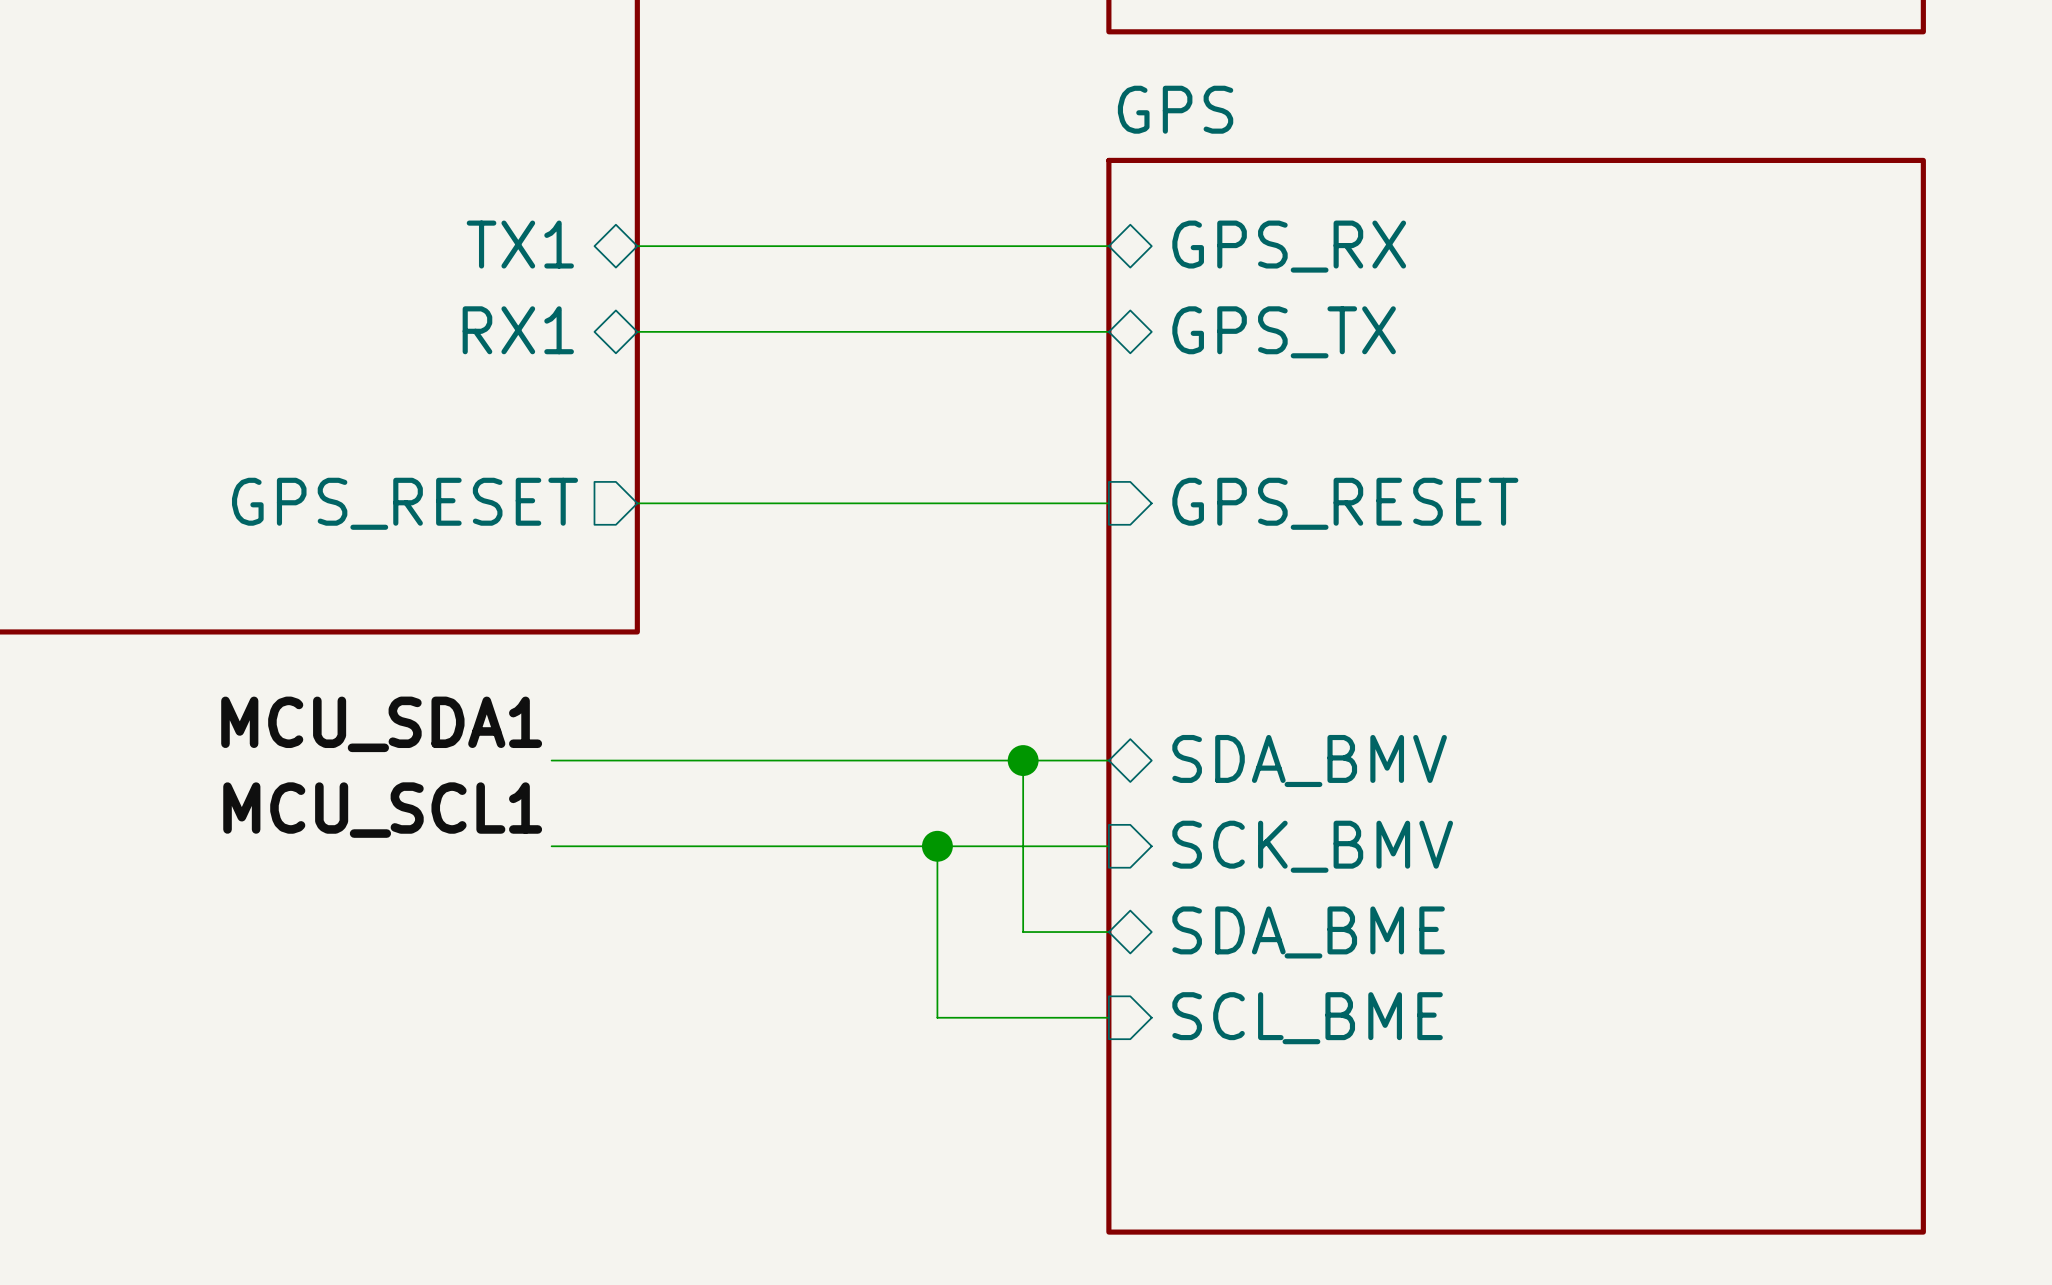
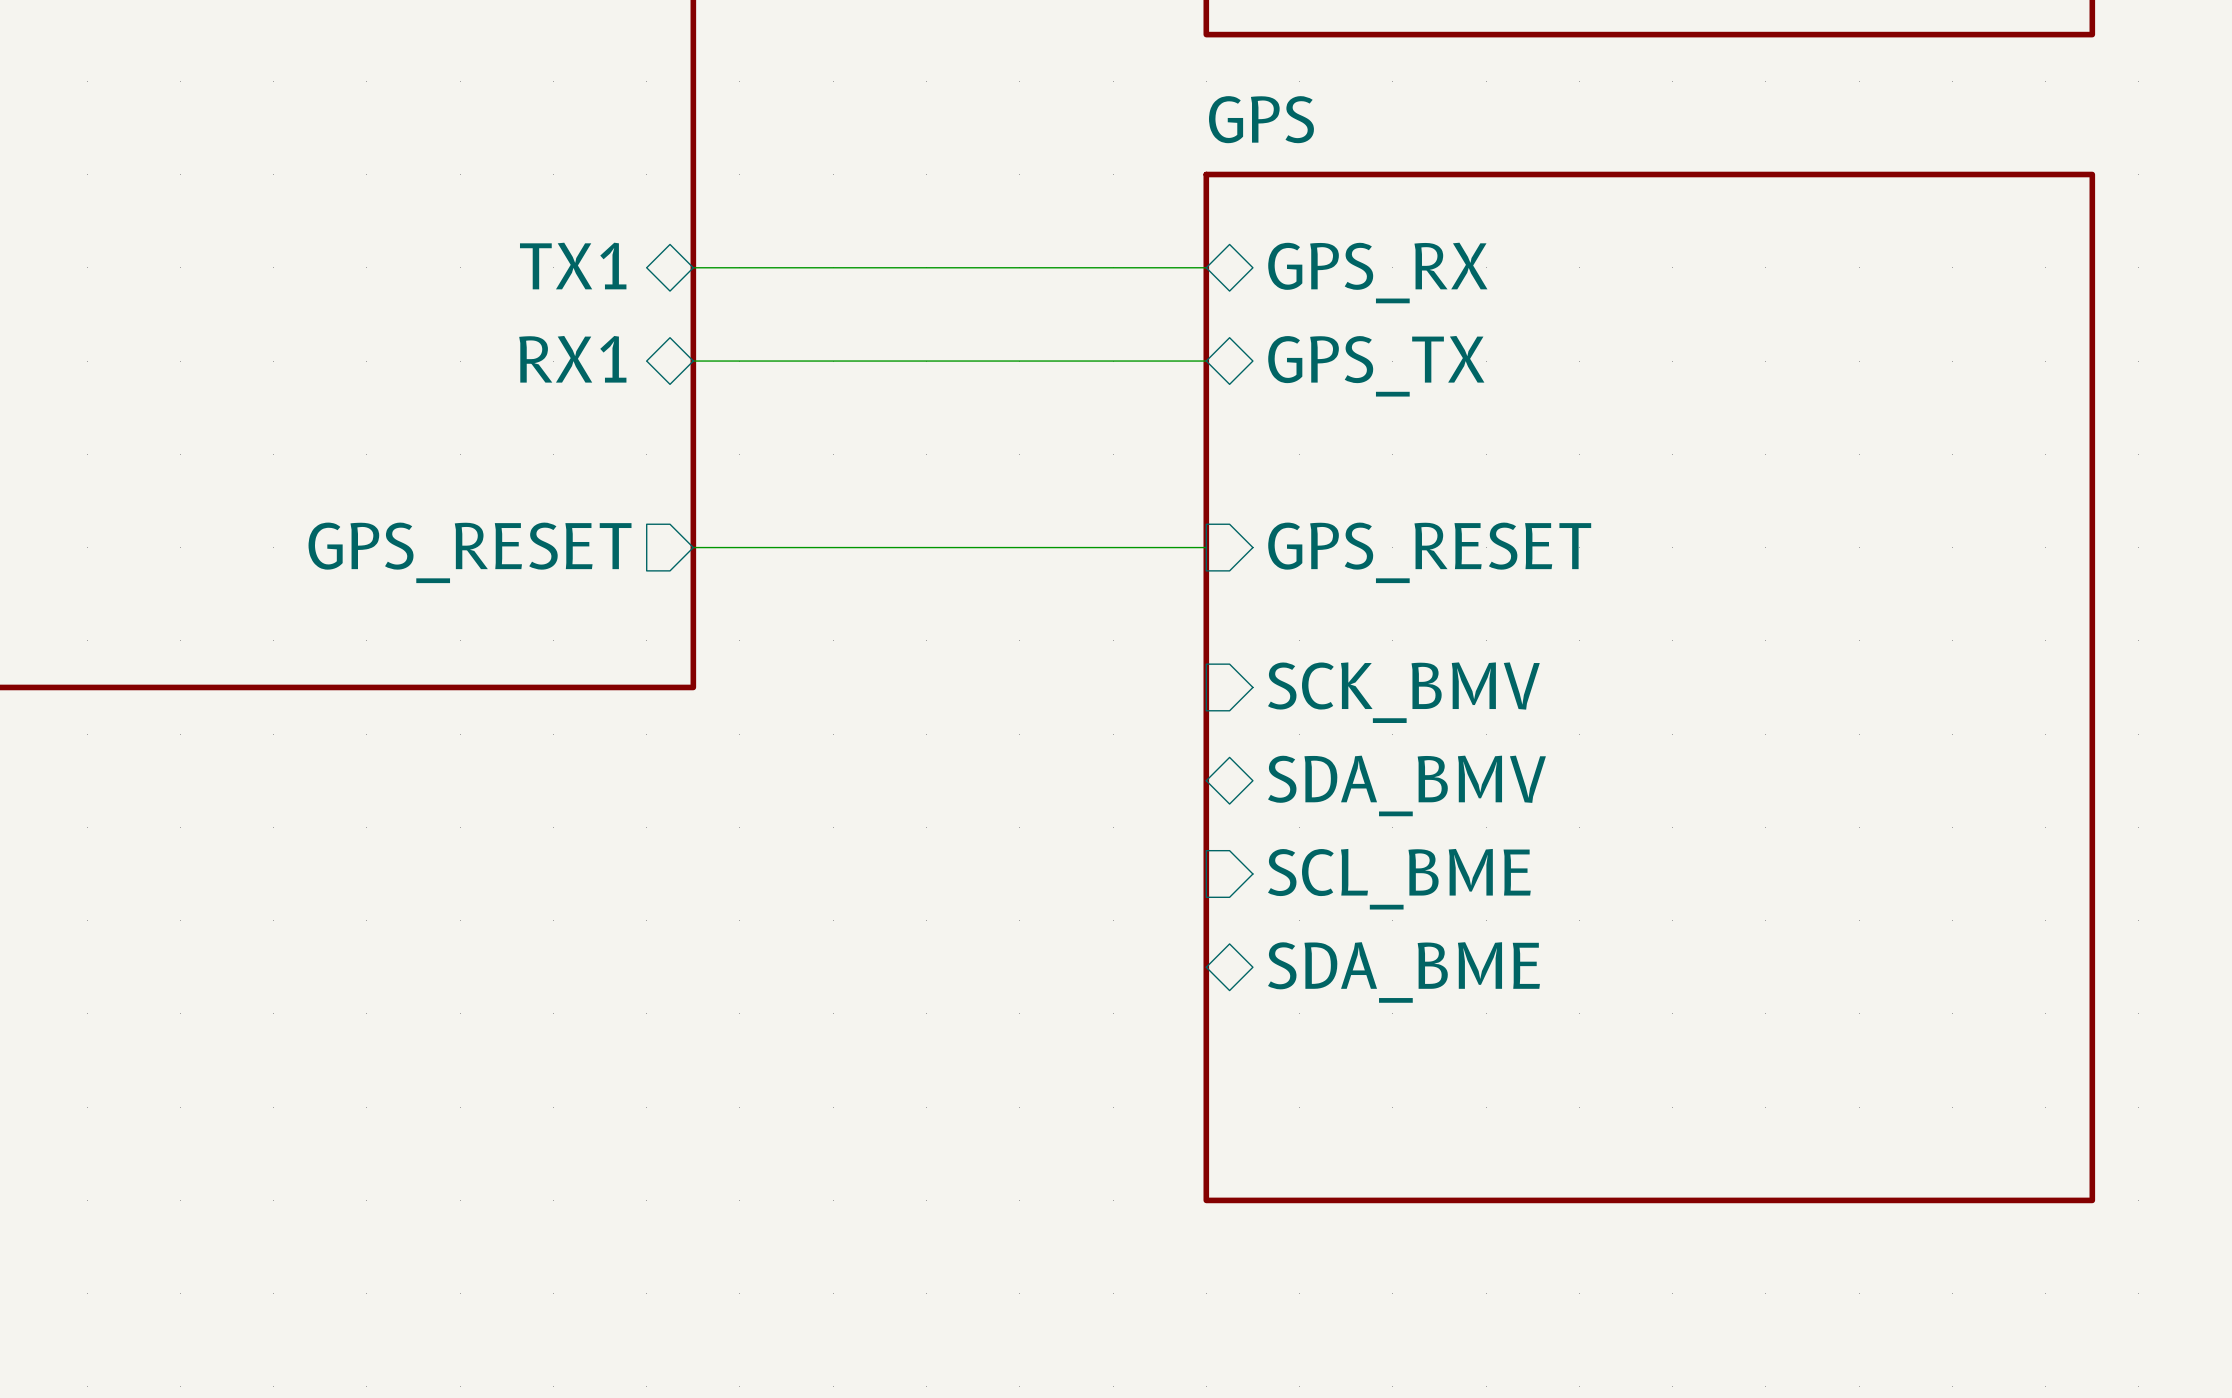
sheet GPS: none -> (1649, 687)
sheet GPS: (1516, 696) -> none
label: MCU_SDA1 (381, 724) -> none
wire: (551, 760) (1108, 760) -> none
wire: (1023, 760) (1023, 932) (1108, 932) -> none
junction: (1023, 760) -> none
sheet pin position: SDA_BMV (1309, 760) -> SDA_BMV (1406, 785)
label: MCU_SCL1 (382, 810) -> none
wire: (551, 846) (1108, 846) -> none
wire: (937, 846) (937, 1017) (1108, 1017) -> none
junction: (937, 846) -> none
sheet pin position: SCK_BMV (1312, 846) -> SCK_BMV (1403, 692)
sheet pin position: SDA_BME (1308, 932) -> SDA_BME (1403, 972)
sheet pin position: SCL_BME (1307, 1018) -> SCL_BME (1399, 879)

